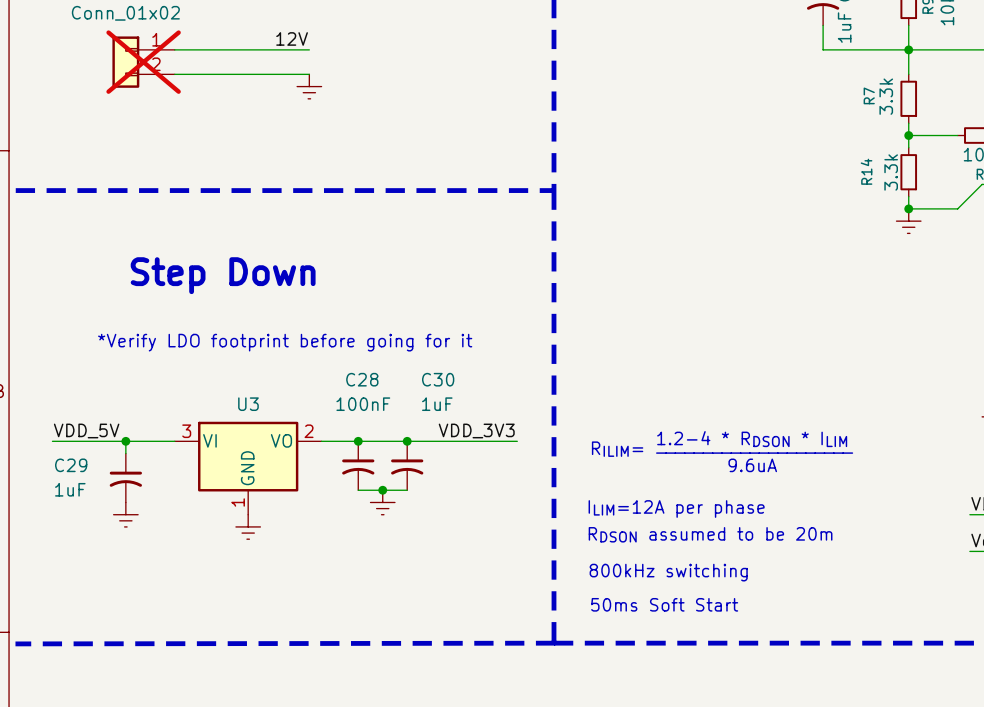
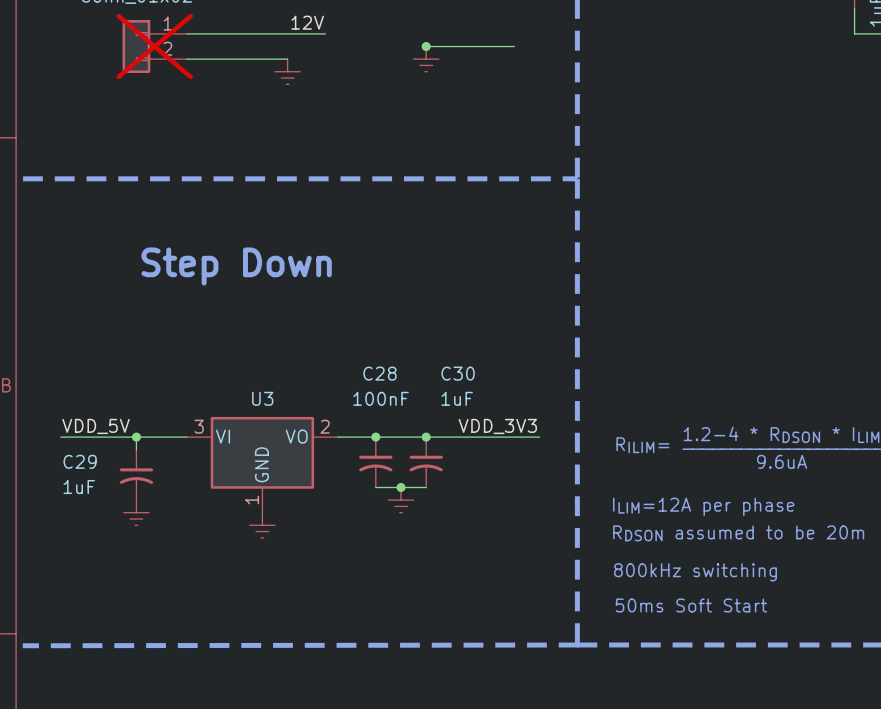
wire: none -> (426, 46) (514, 46)
junction: none -> (426, 46)
wire: (272, 74) (309, 74) -> none
power symbol: none -> (426, 59)
power symbol position: (309, 86) -> (287, 71)
text: *Verify LDO footprint before going for it (285, 342) -> none

